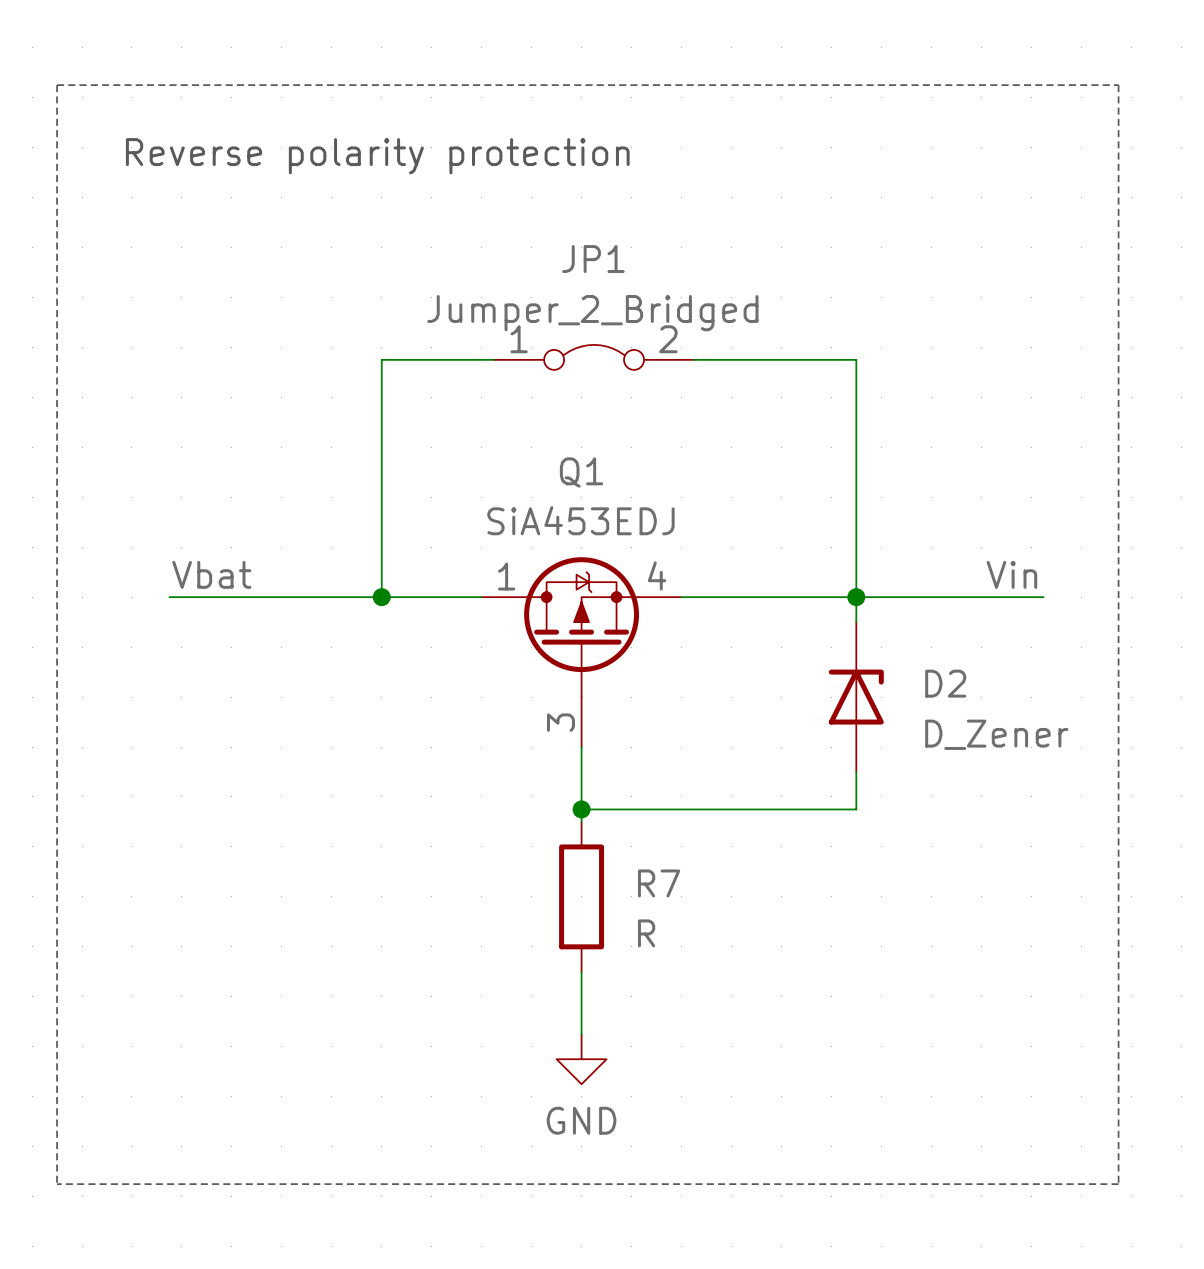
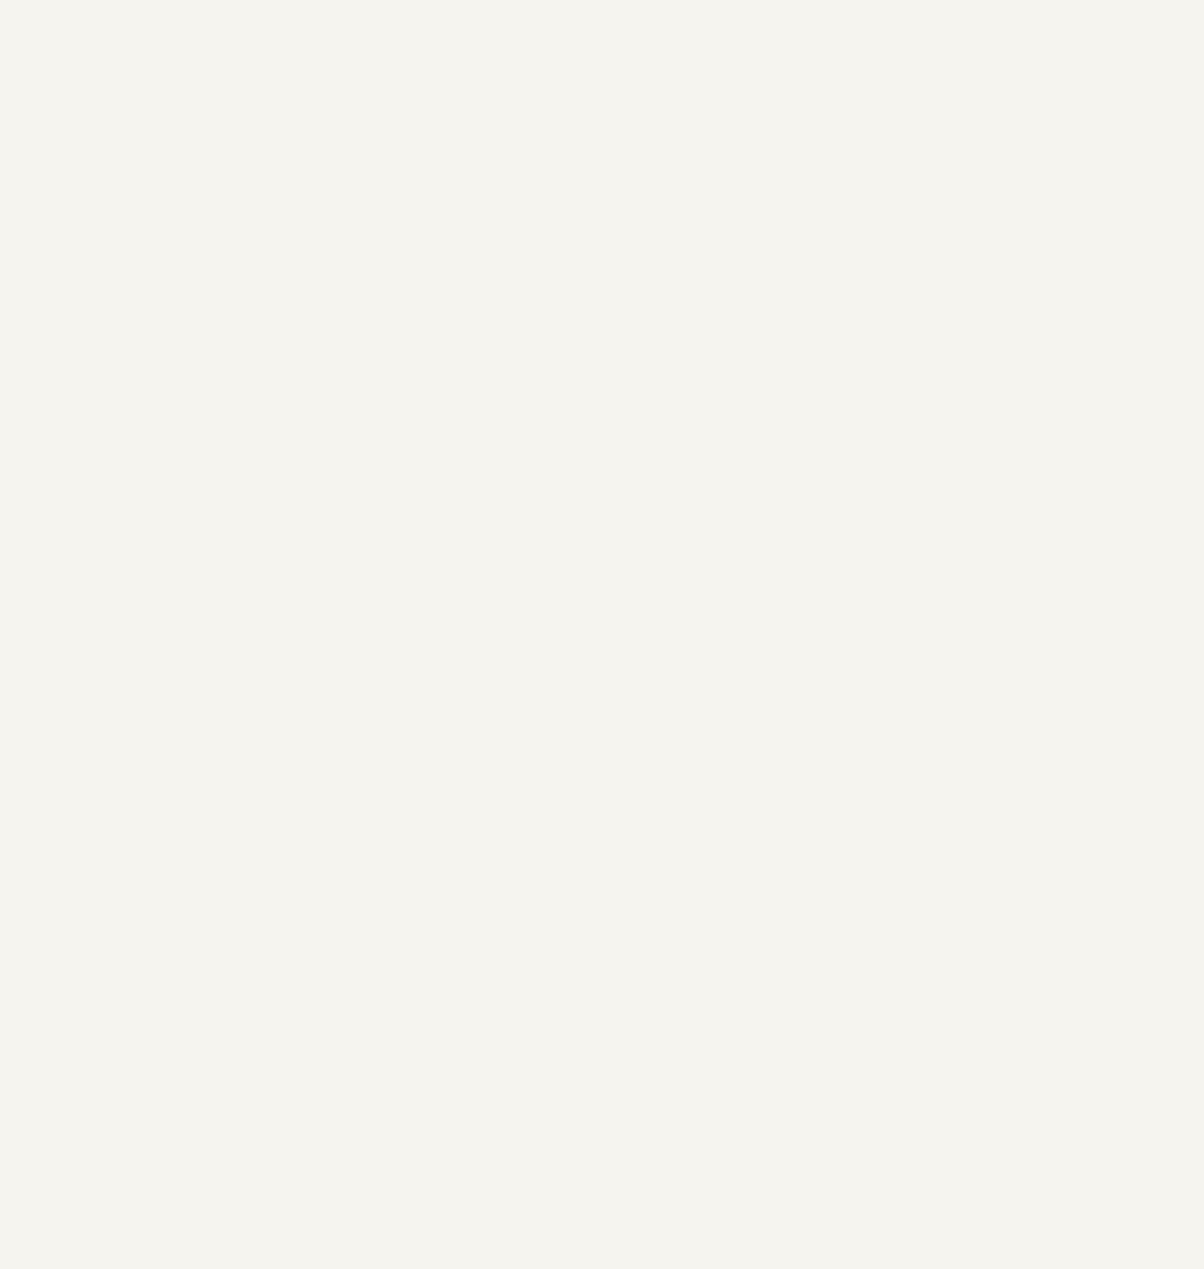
line: (57, 85) (57, 1184) (1118, 1184) (1118, 85) (57, 85) -> none
text: Reverse polarity protection (377, 156) -> none
JP1: Jumper_2_Bridged (594, 357) -> none
wire: (494, 359) (381, 359) (381, 597) -> none
wire: (693, 359) (856, 359) (856, 622) -> none
label: Vbat (211, 574) -> none
label: Vin (1011, 574) -> none
wire: (169, 597) (481, 597) -> none
junction: (381, 597) -> none
wire: (681, 597) (1043, 597) -> none
junction: (856, 597) -> none
Q1: SiA453EDJ (581, 652) -> none
D2: D_Zener (856, 697) -> none
wire: (581, 747) (581, 821) -> none
wire: (856, 771) (856, 809) (581, 809) -> none
junction: (581, 809) -> none
R7: R (581, 896) -> none
wire: (581, 971) (581, 1034) -> none
power symbol: GND (581, 1059) -> none

